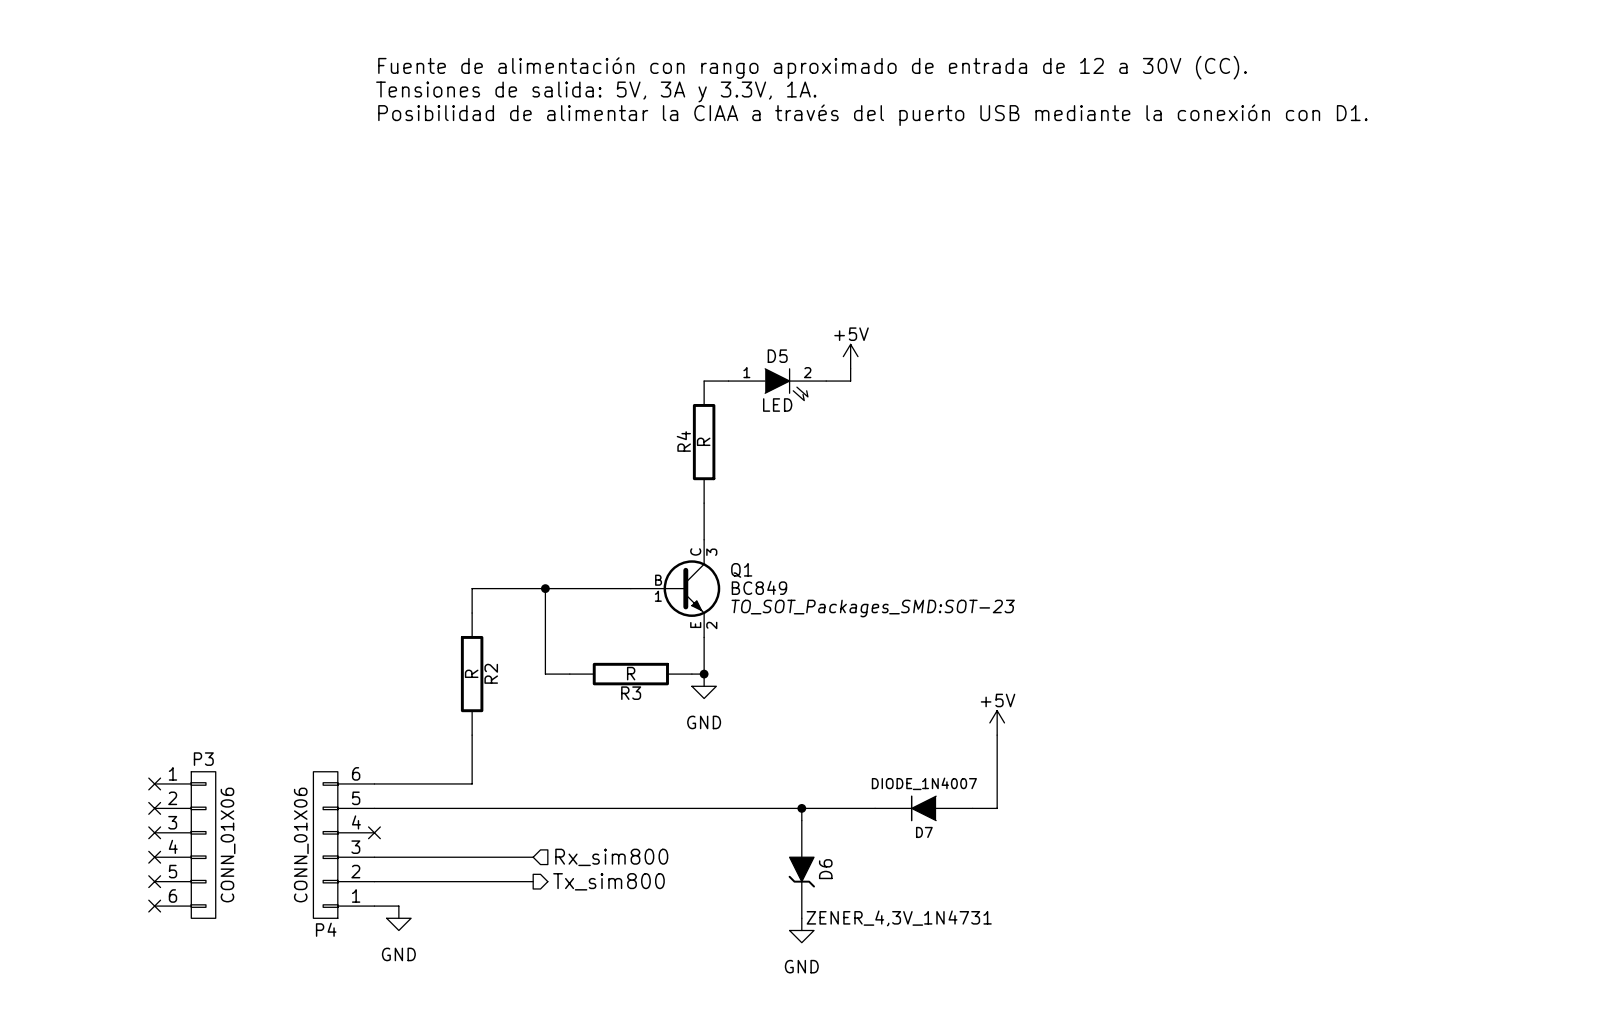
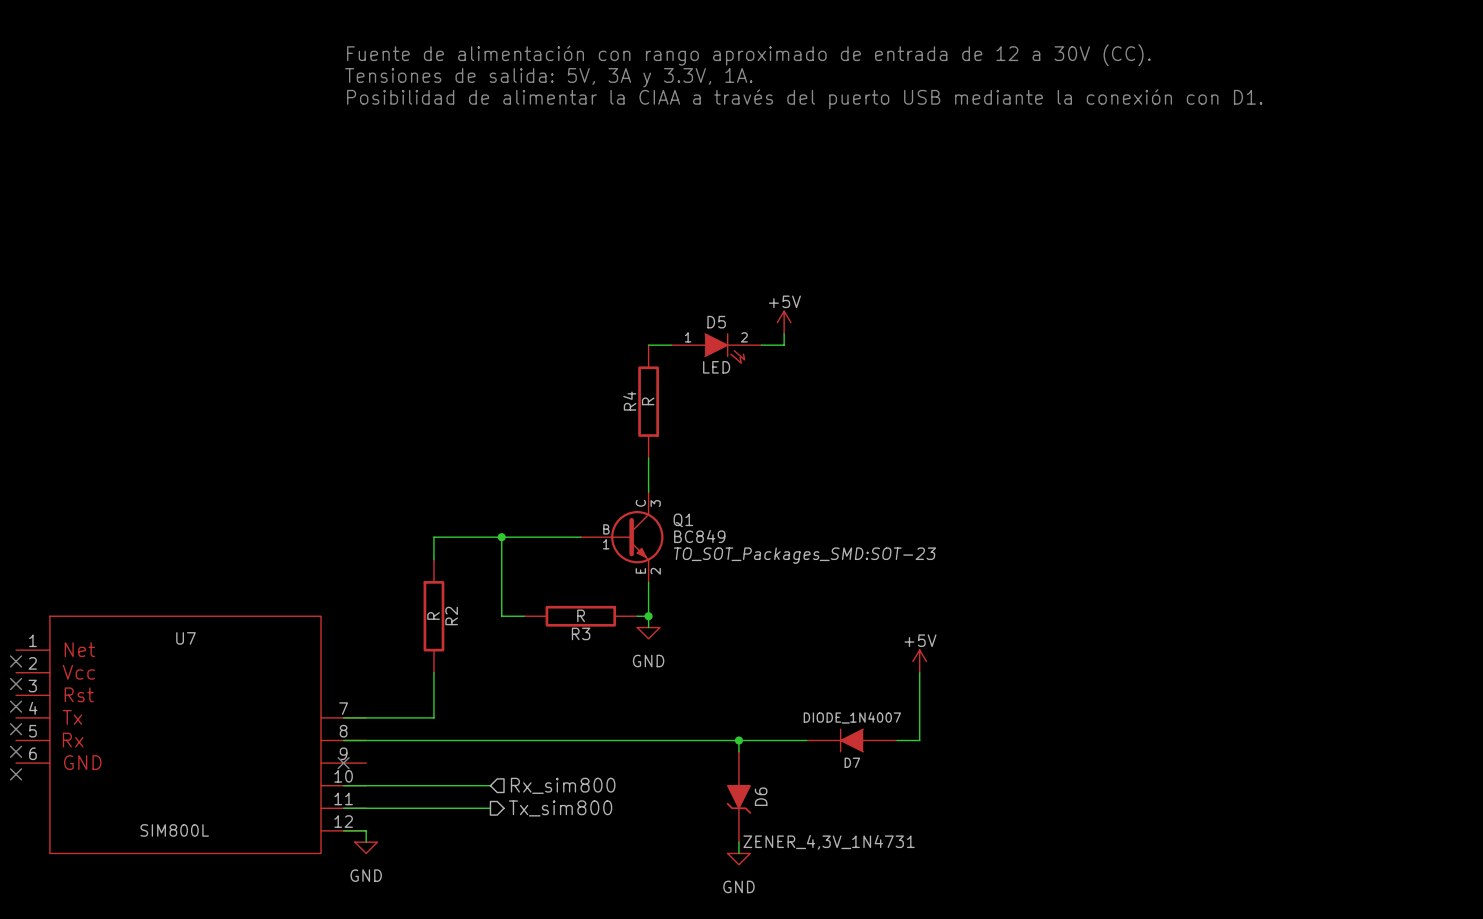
no-connect mark: none -> (16, 661)
no-connect mark: none -> (16, 684)
no-connect mark: none -> (16, 706)
no-connect mark: (154, 783) -> none
no-connect mark: none -> (16, 729)
U7: none -> SIM800L (191, 734)
no-connect mark: (154, 808) -> none
no-connect mark: none -> (16, 751)
no-connect mark: (154, 832) -> none
no-connect mark: none -> (16, 774)
P3: CONN_01X06 (185, 845) -> none
P4: CONN_01X06 (343, 845) -> none
no-connect mark: (154, 857) -> none
no-connect mark: (154, 881) -> none
no-connect mark: (154, 906) -> none

